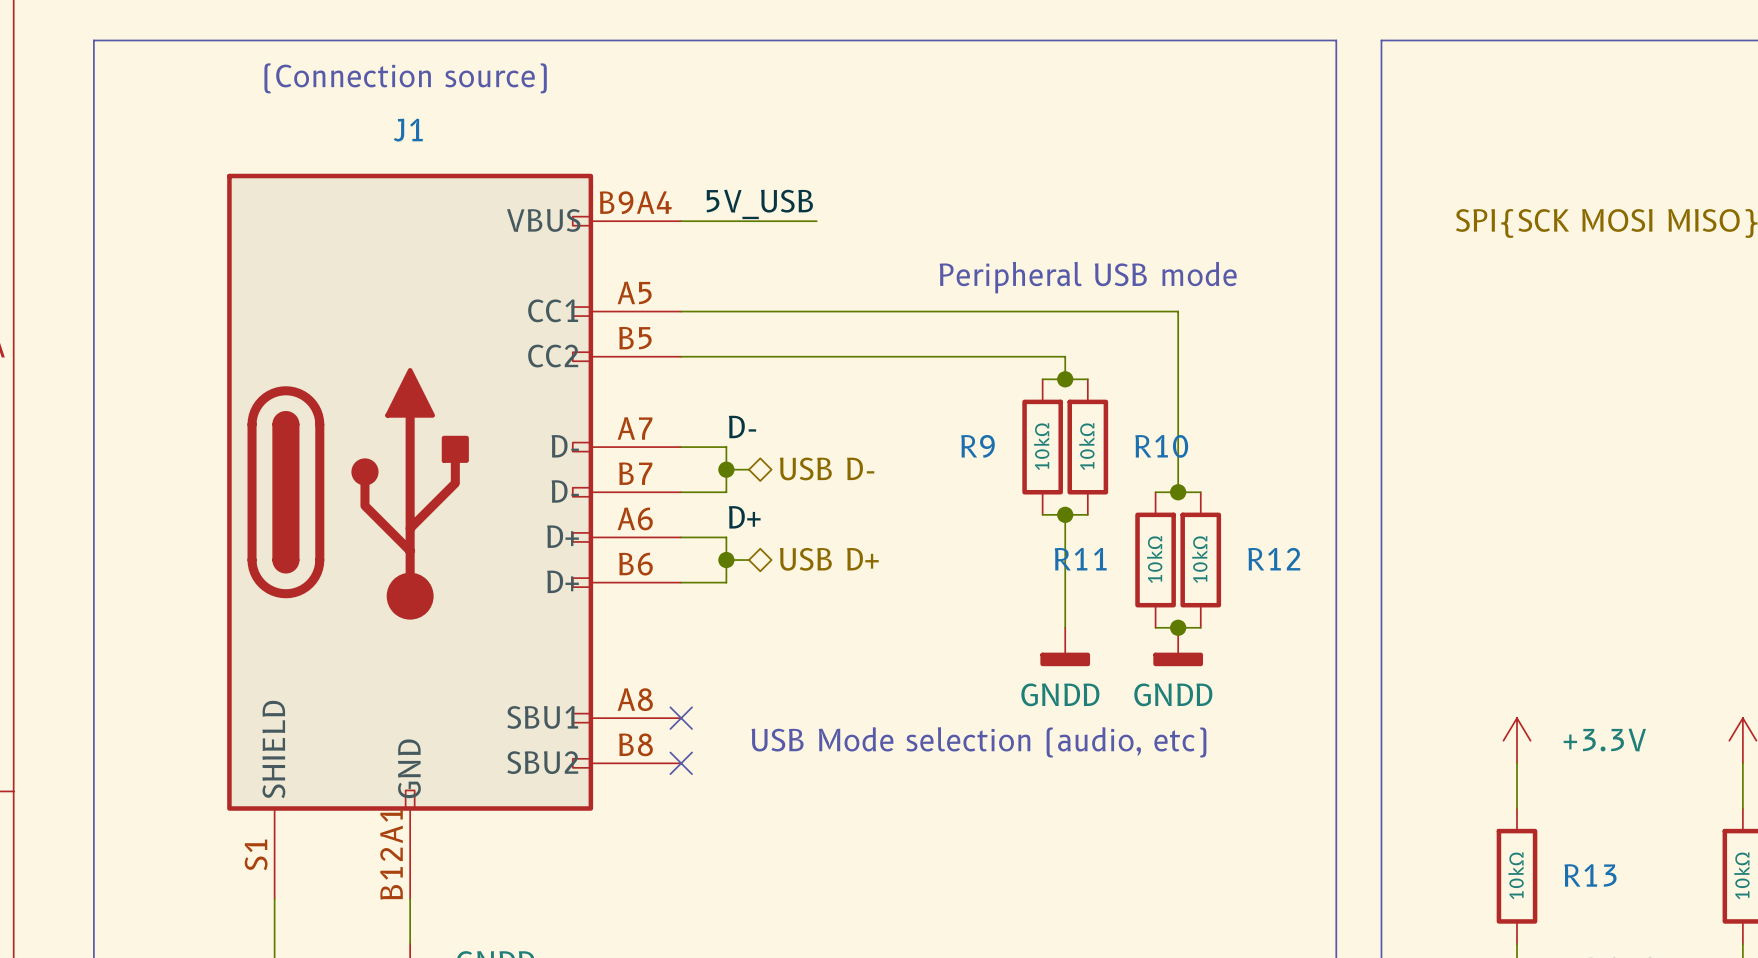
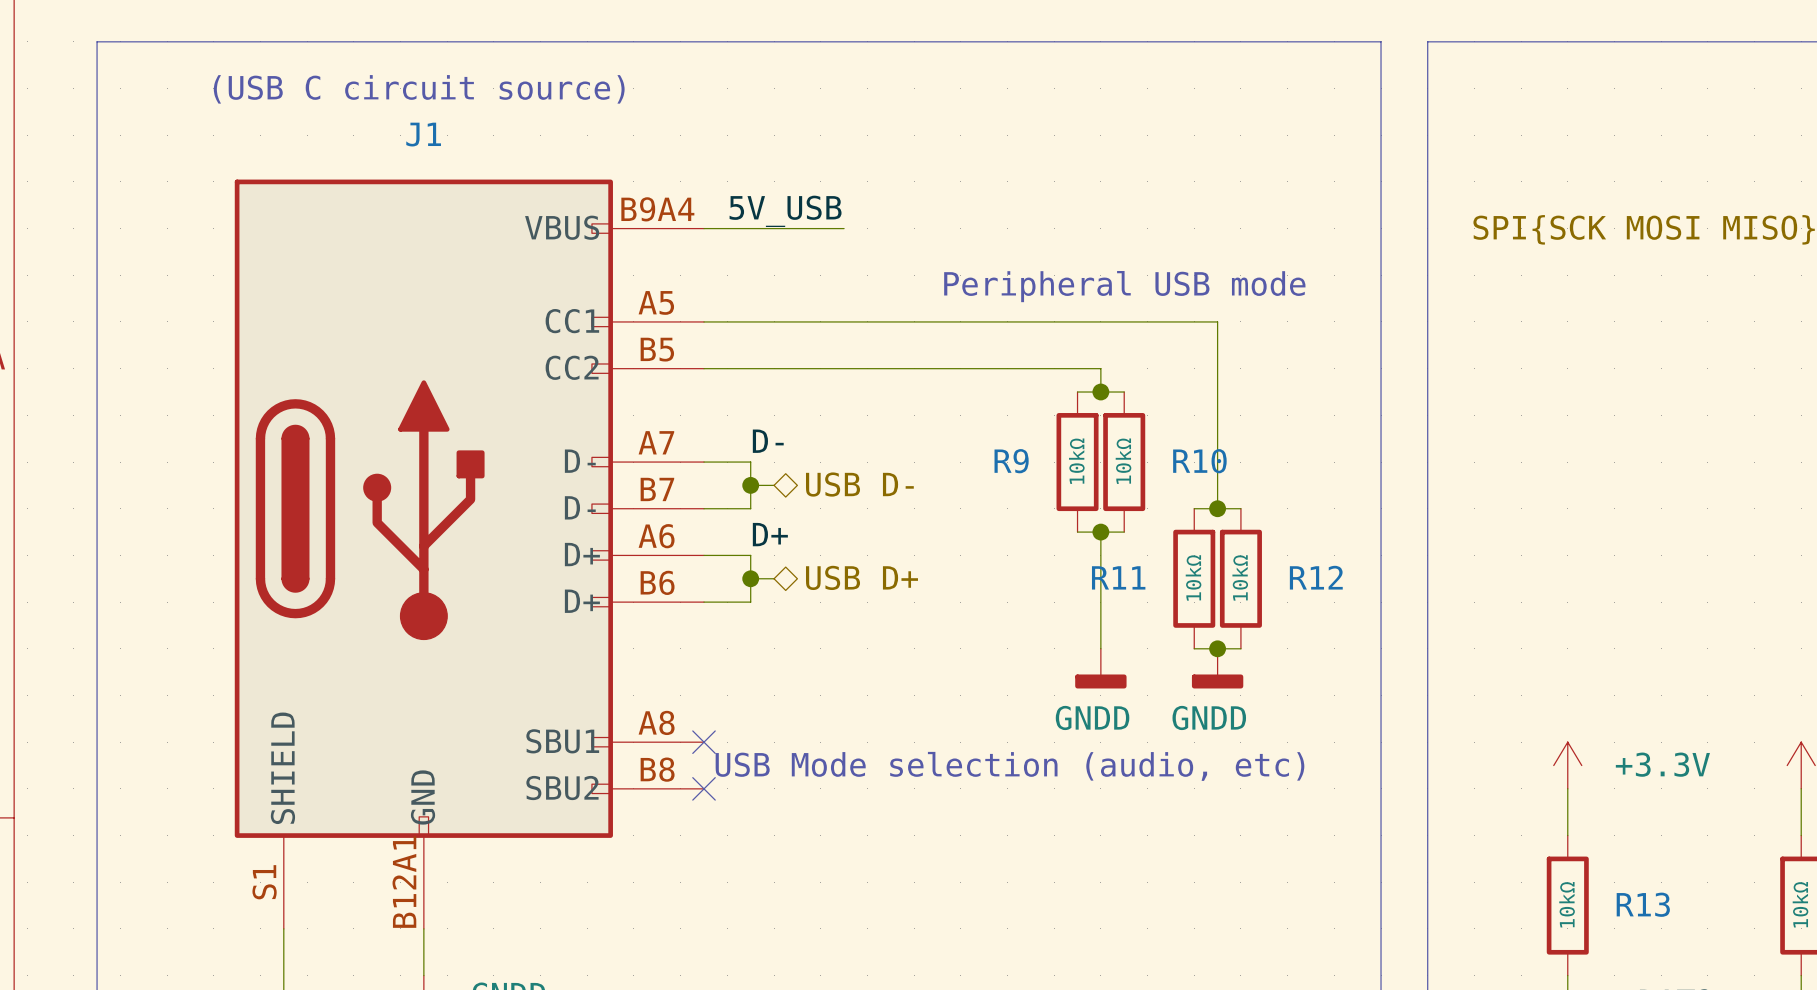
text: (Connection source) (405, 78) -> (USB C circuit source) (419, 89)

